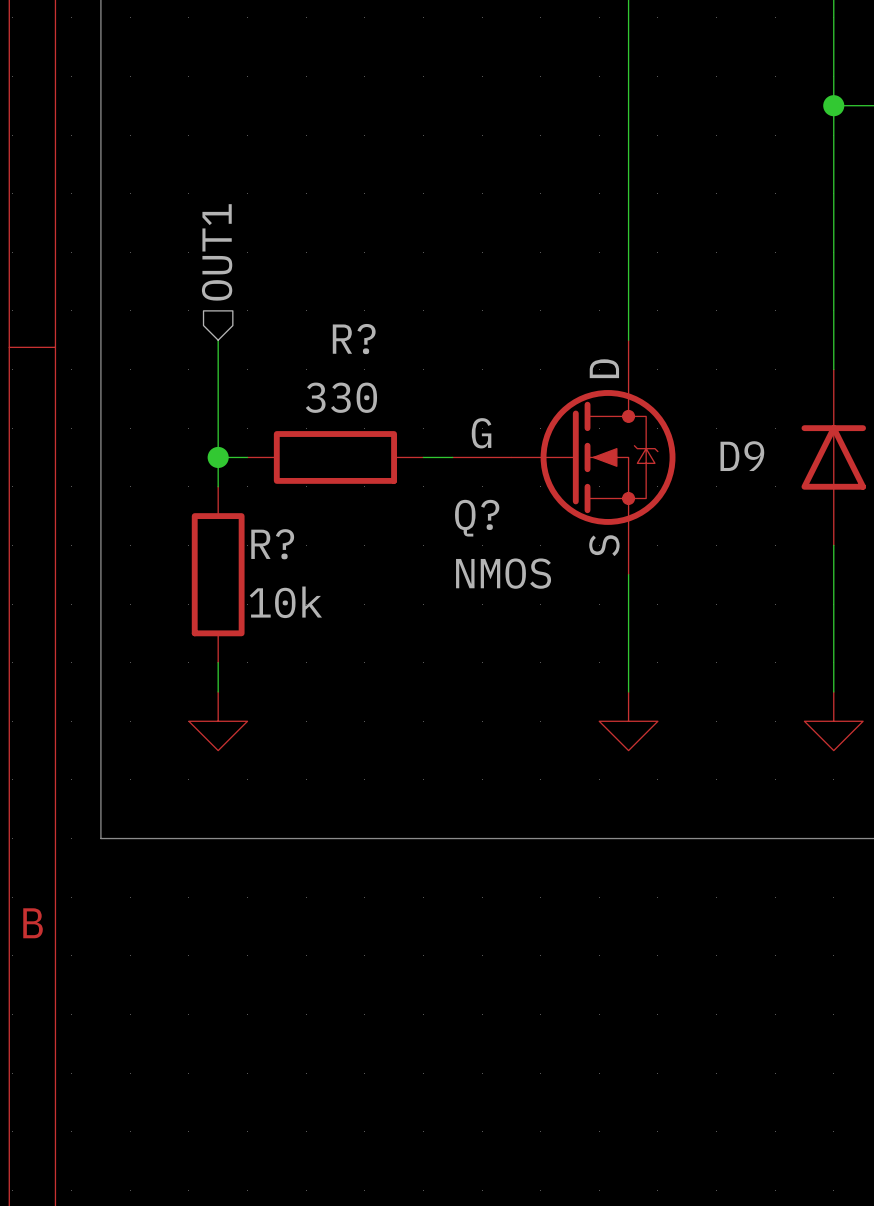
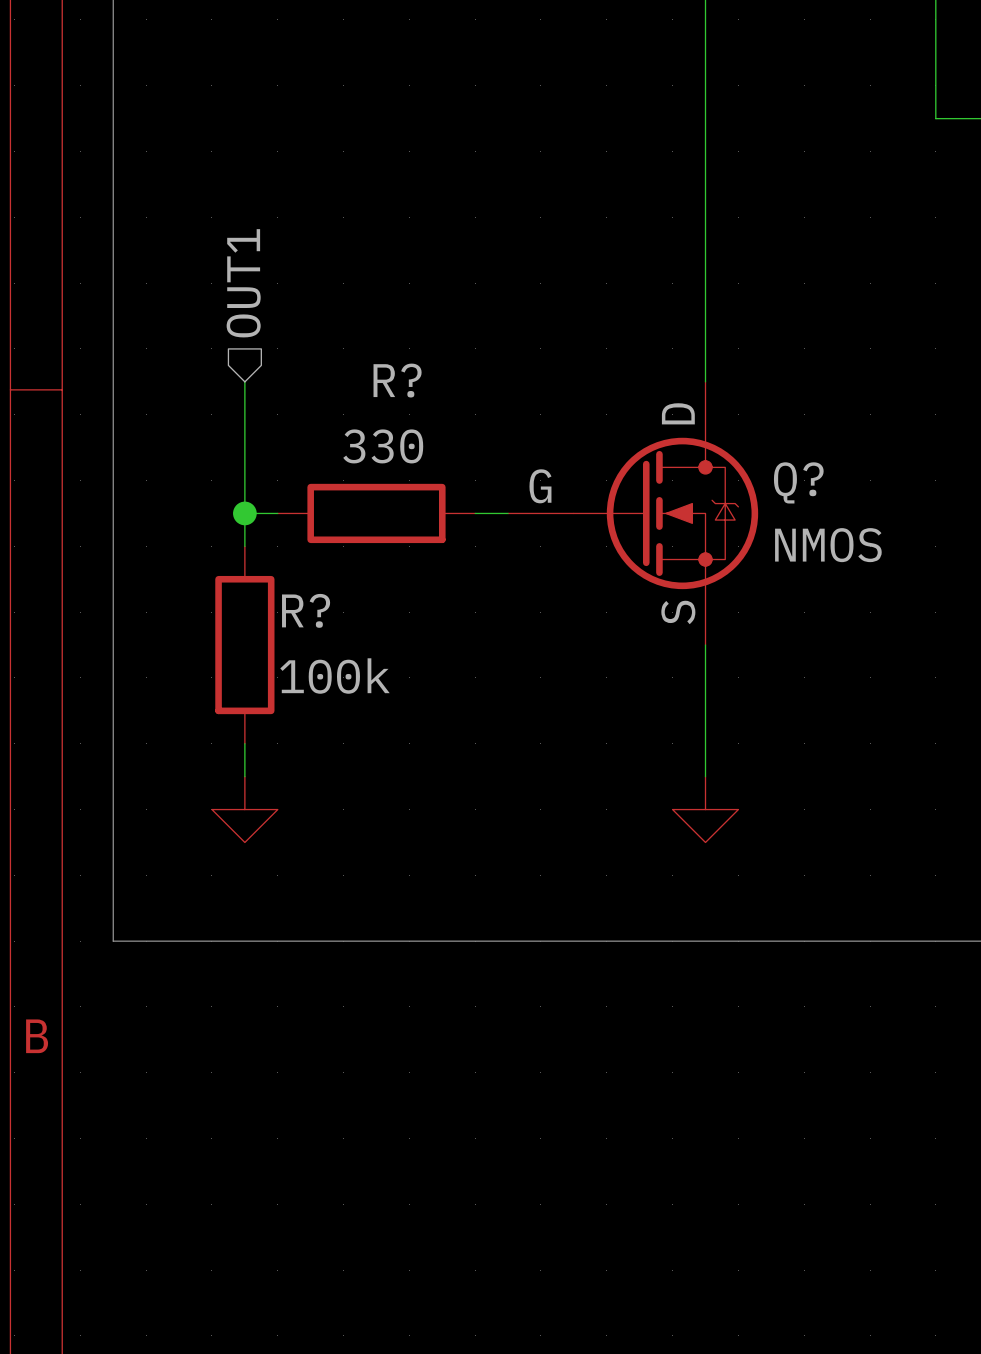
wire: (833, 105) (833, 369) -> none
junction: (833, 105) -> none
D9: (833, 457) -> none
Q? name position: Q? (477, 518) -> Q? (798, 482)
wire: (833, 545) (833, 691) -> none
Q? value position: NMOS (503, 573) -> NMOS (828, 545)
R? value: 10k (285, 602) -> 100k (334, 676)
power symbol: (833, 721) -> none

